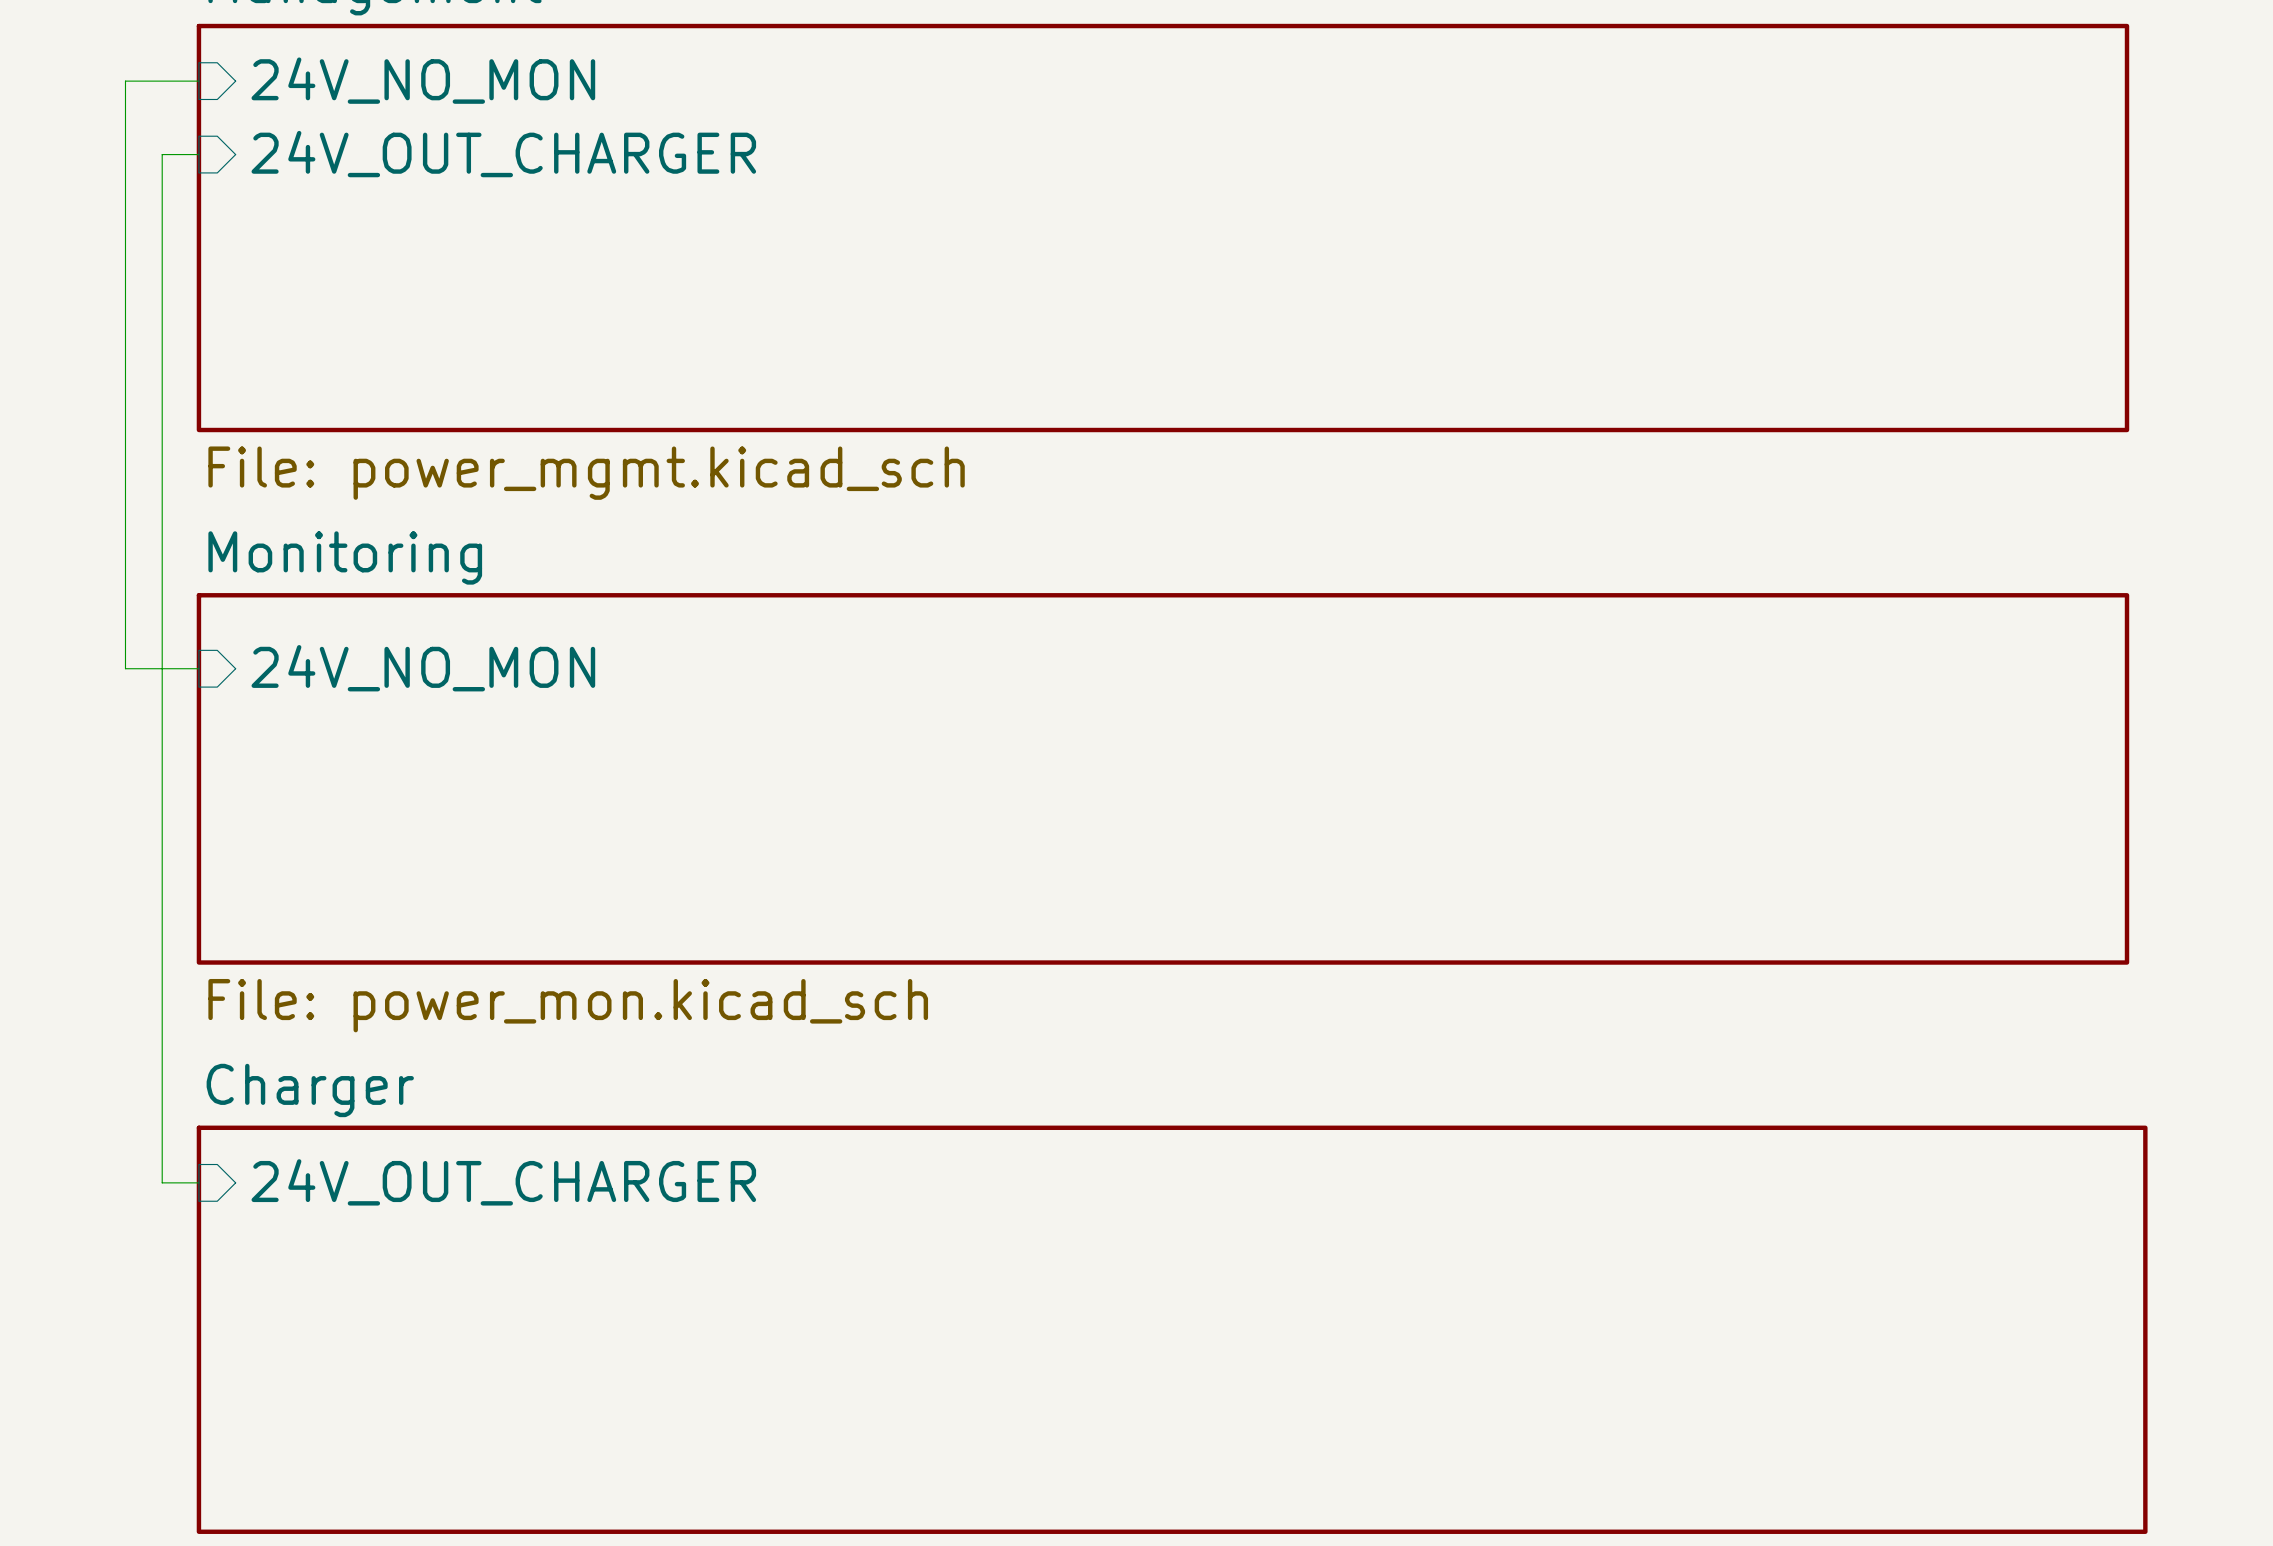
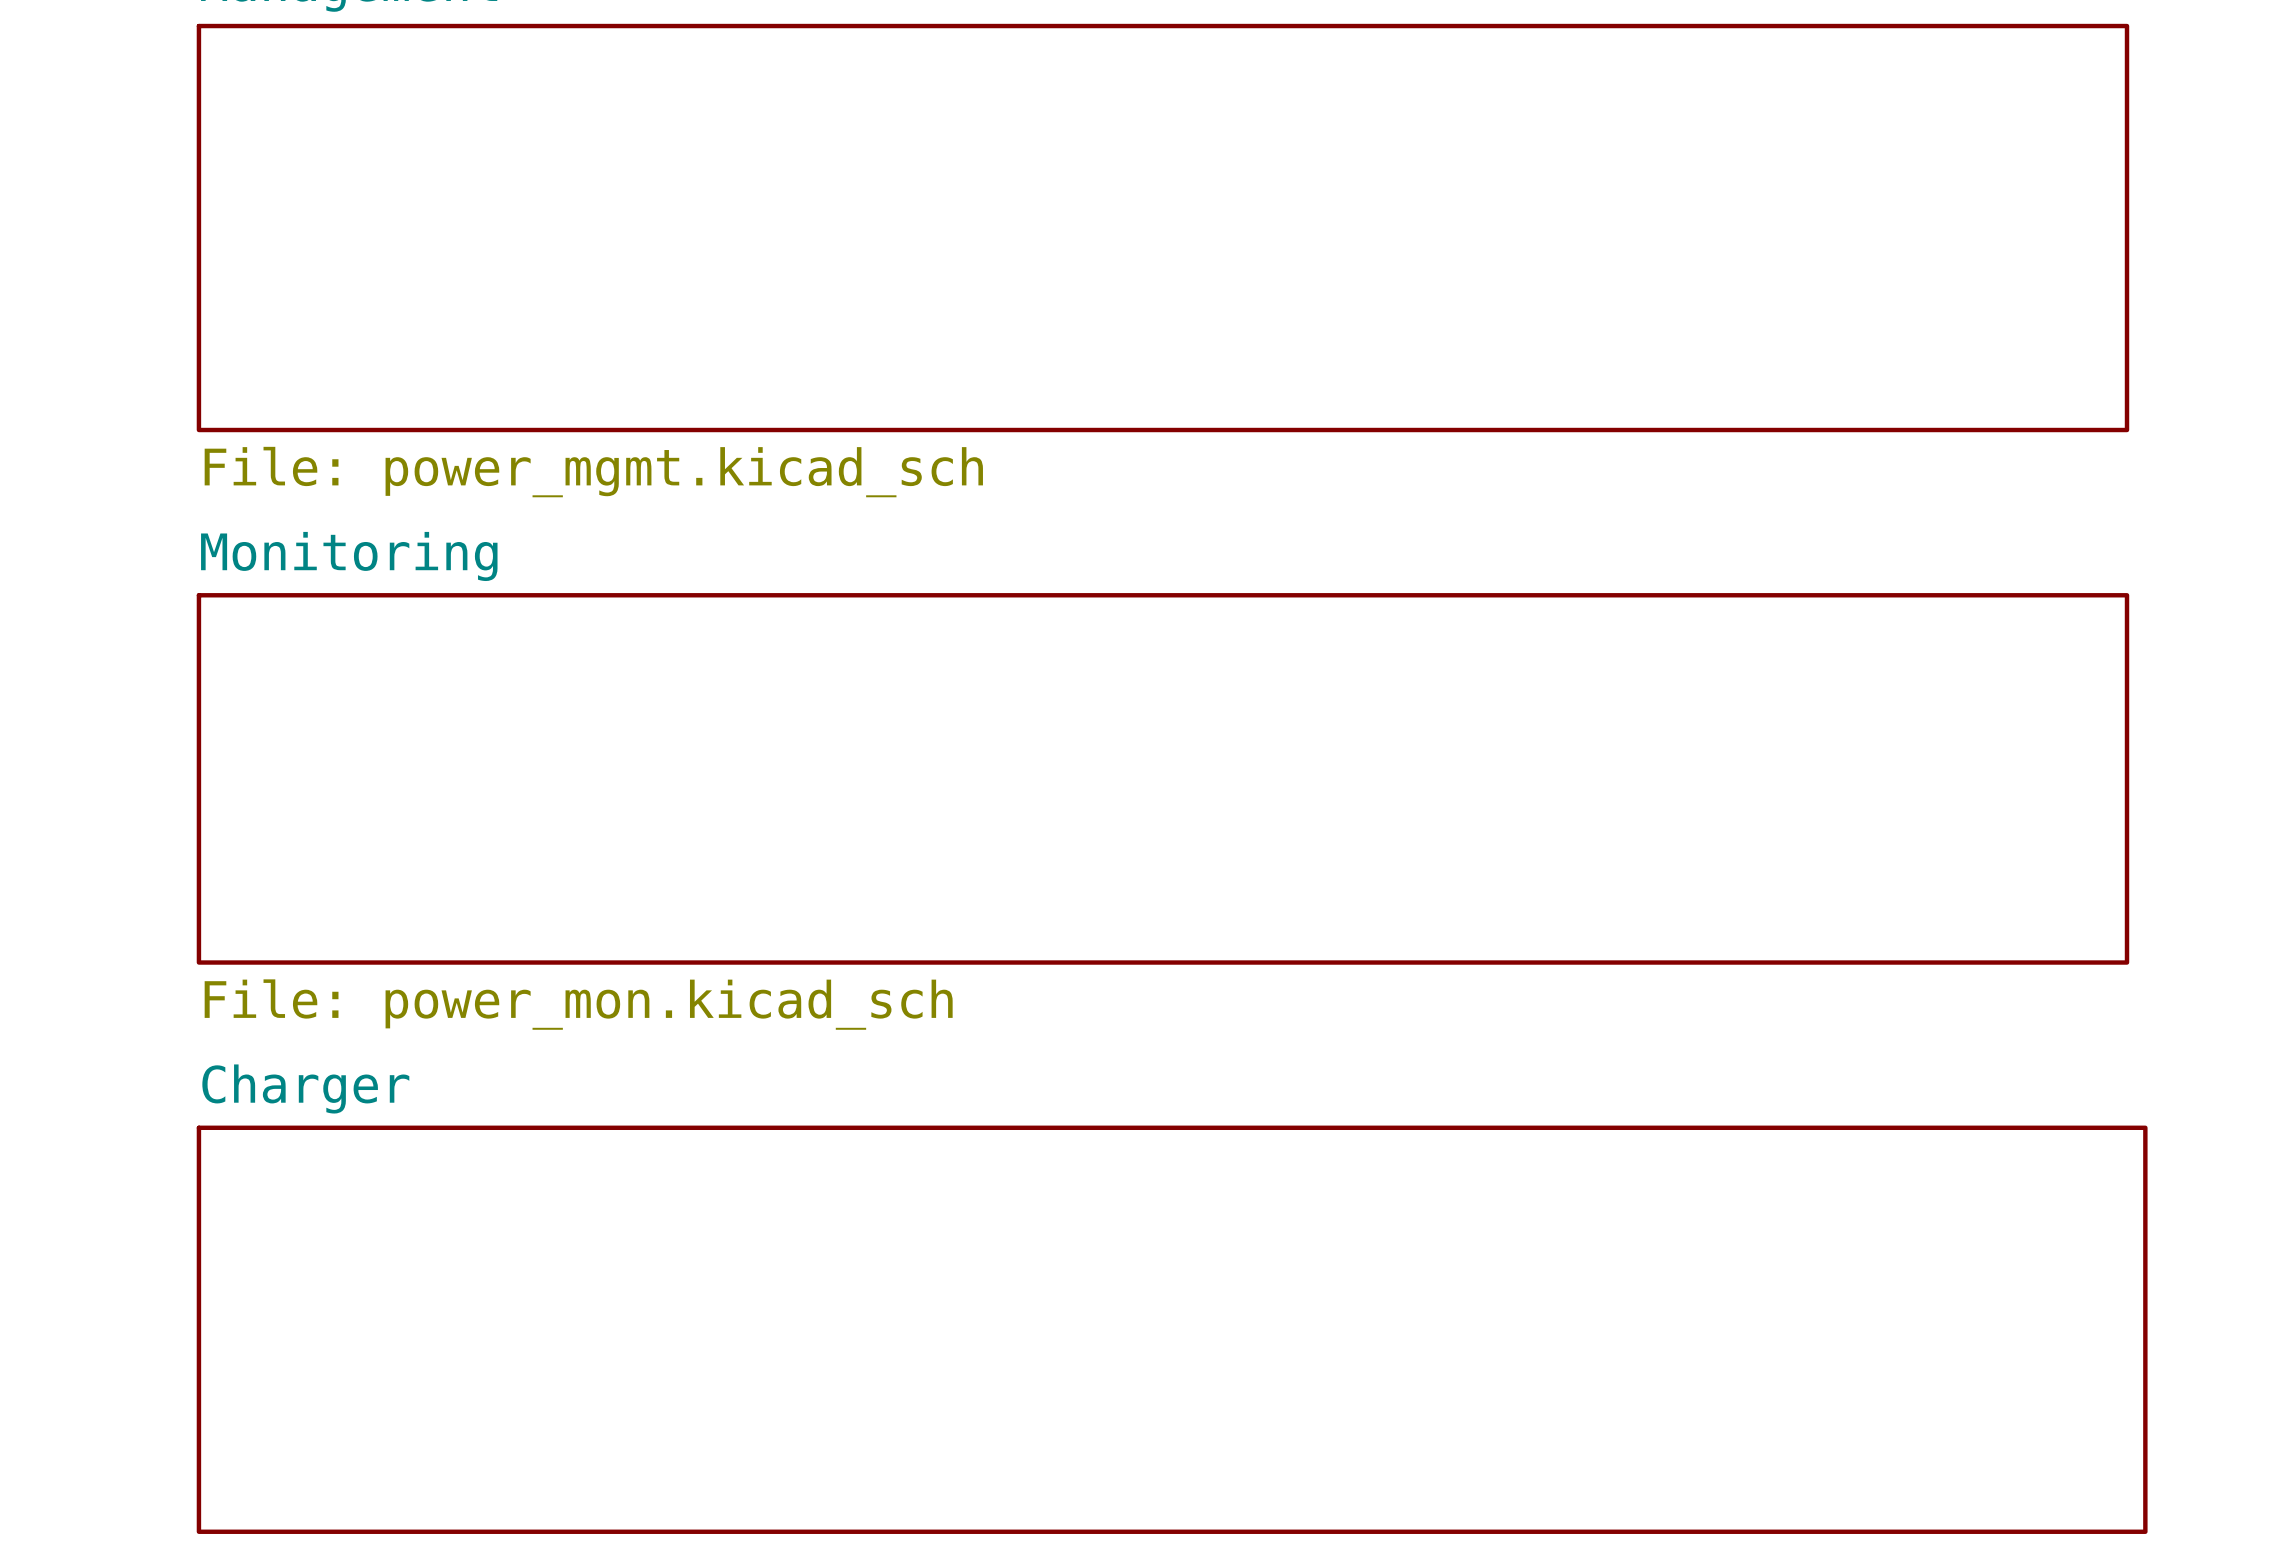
sheet pin: 24V_NO_MON (423, 80) -> none
wire: (198, 81) (125, 81) (125, 668) (198, 668) -> none
wire: (198, 154) (162, 154) (162, 1182) (198, 1182) -> none
sheet pin: 24V_OUT_CHARGER (503, 154) -> none
sheet pin: 24V_NO_MON (423, 668) -> none
sheet pin: 24V_OUT_CHARGER (503, 1182) -> none

